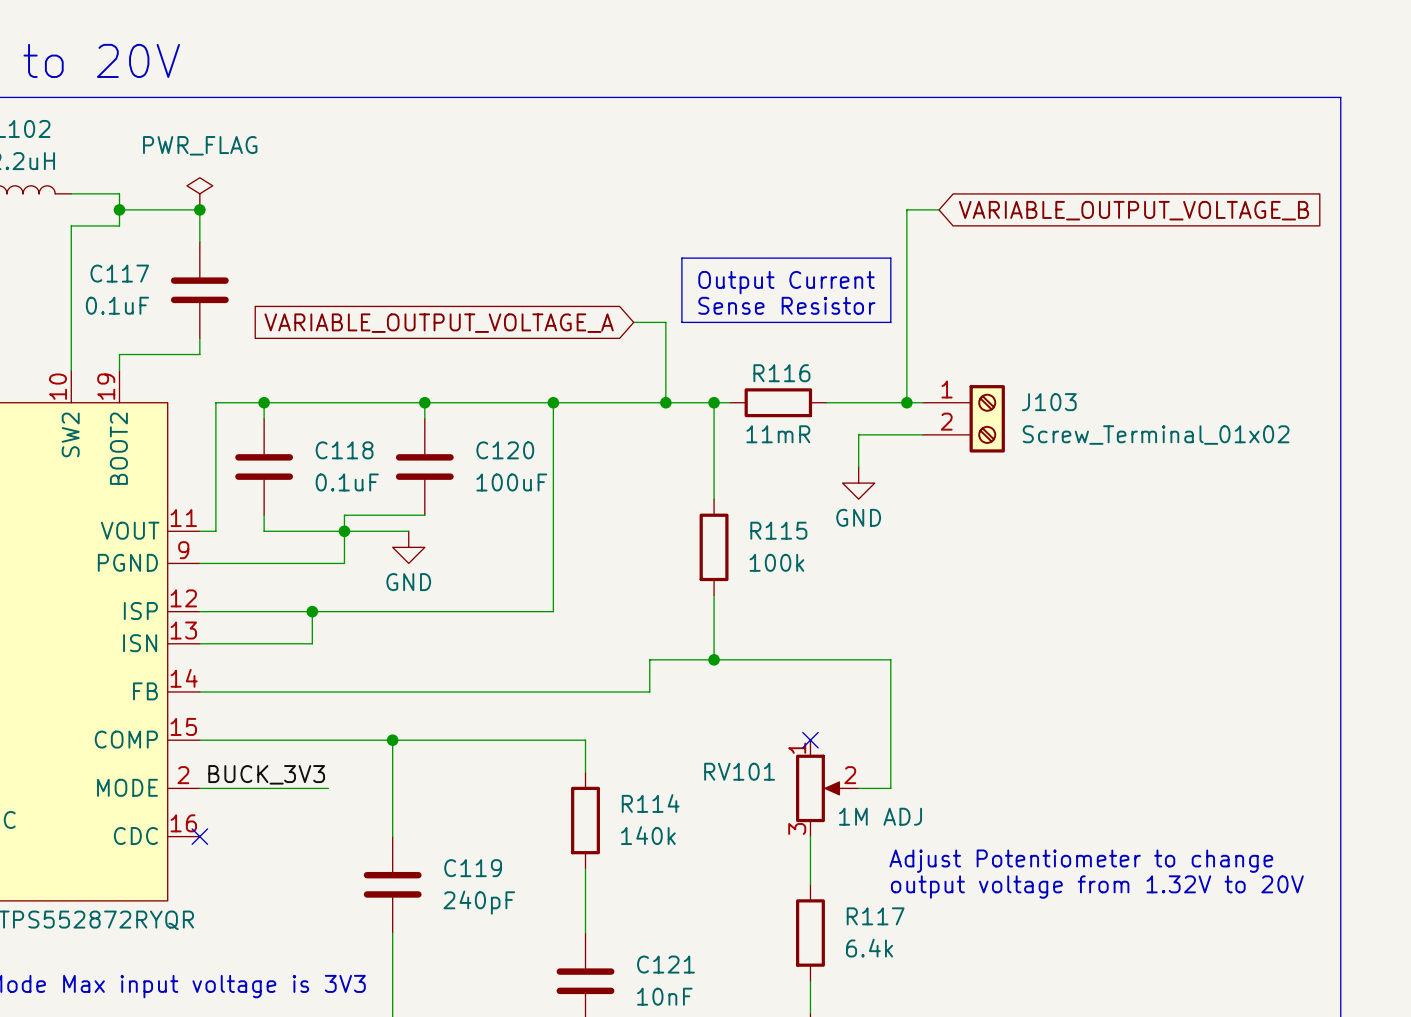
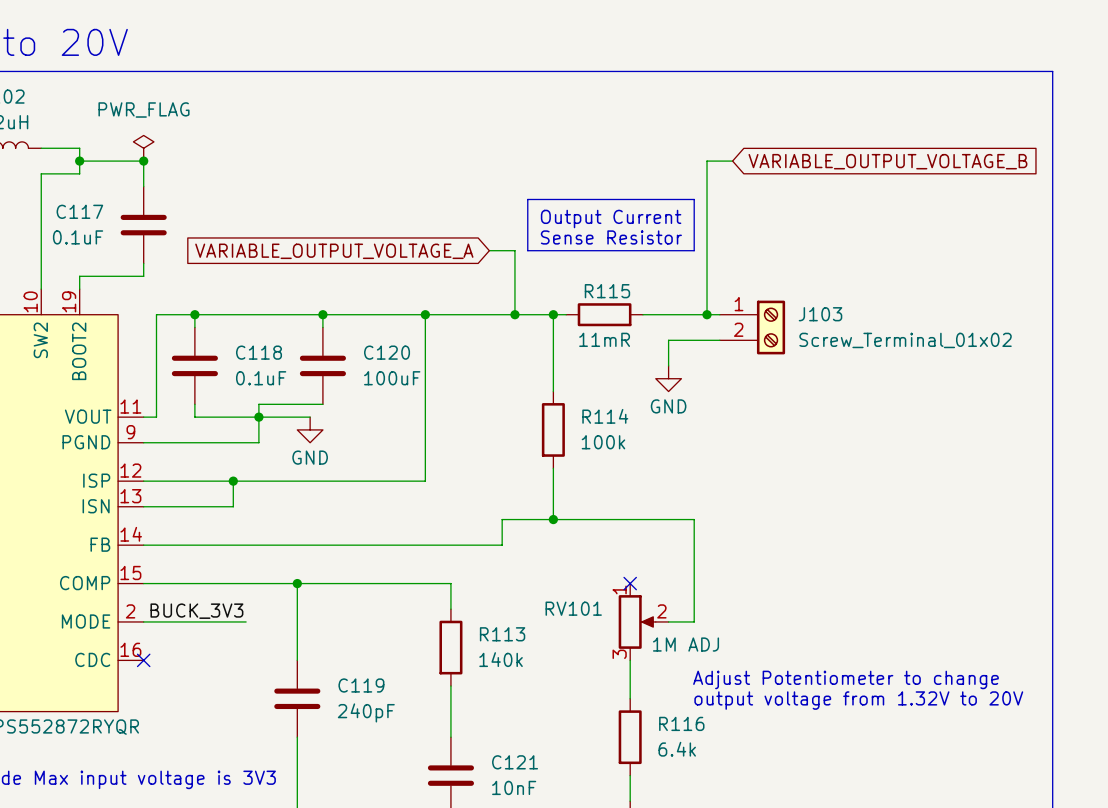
R116 name: R116 (781, 373) -> R115 (607, 291)
R115 name: R115 (778, 530) -> R114 (605, 416)
R114 name: R114 (650, 803) -> R113 (502, 634)
R117 name: R117 (875, 916) -> R116 (681, 723)

